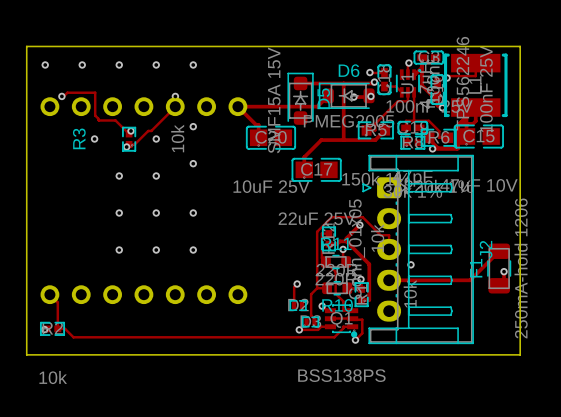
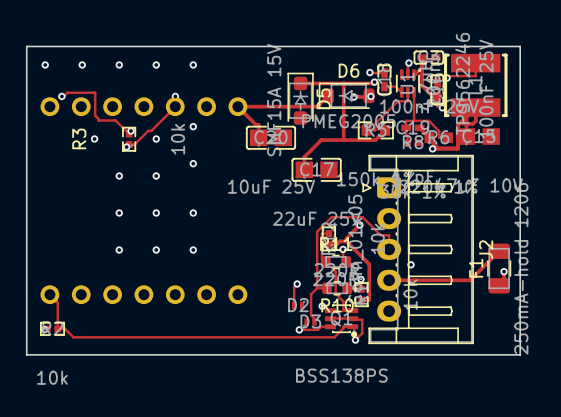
C19 footprint: [397, 120, 429, 135] -> [401, 124, 425, 132]
C15 footprint: [453, 124, 504, 149] -> [457, 128, 500, 146]
R6 footprint: [420, 128, 457, 147] -> [424, 132, 454, 144]
R8 footprint: [400, 135, 426, 150] -> [404, 139, 422, 147]
D2 footprint: [289, 300, 307, 311] -> [292, 301, 306, 310]
D3 footprint: [302, 316, 319, 328] -> [303, 318, 317, 327]

